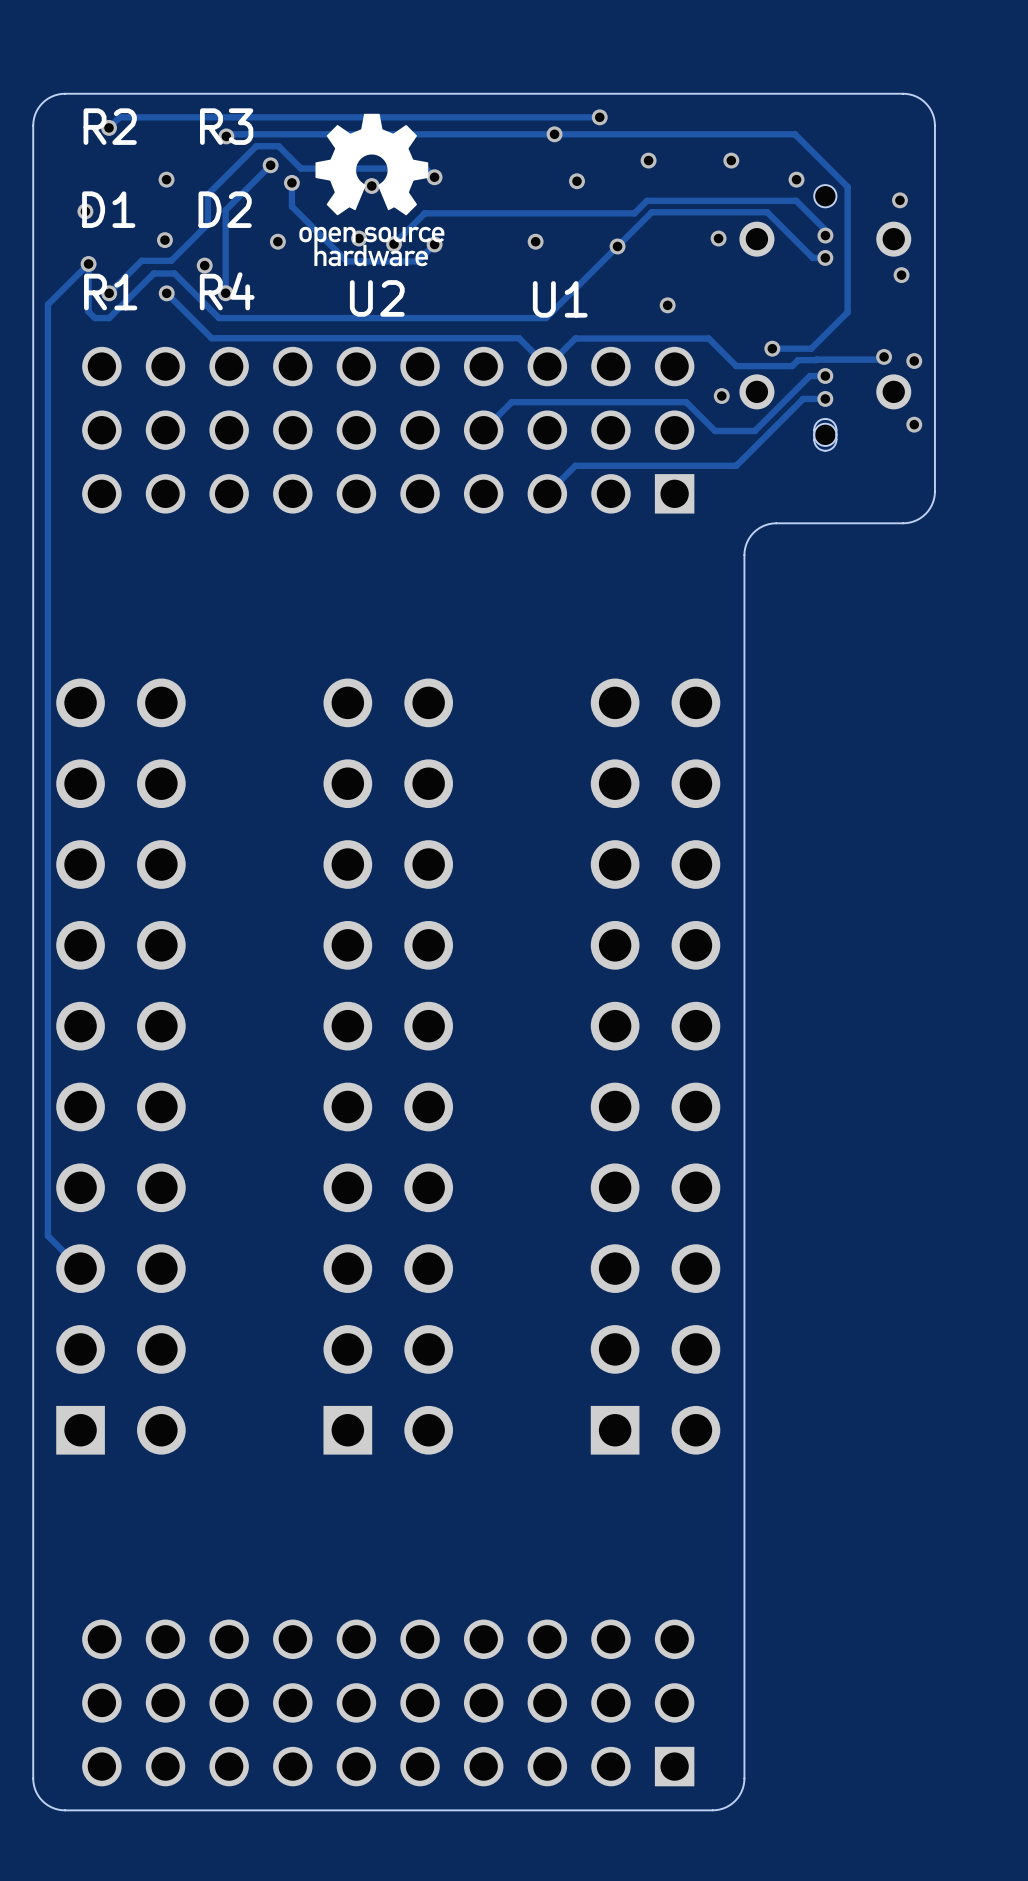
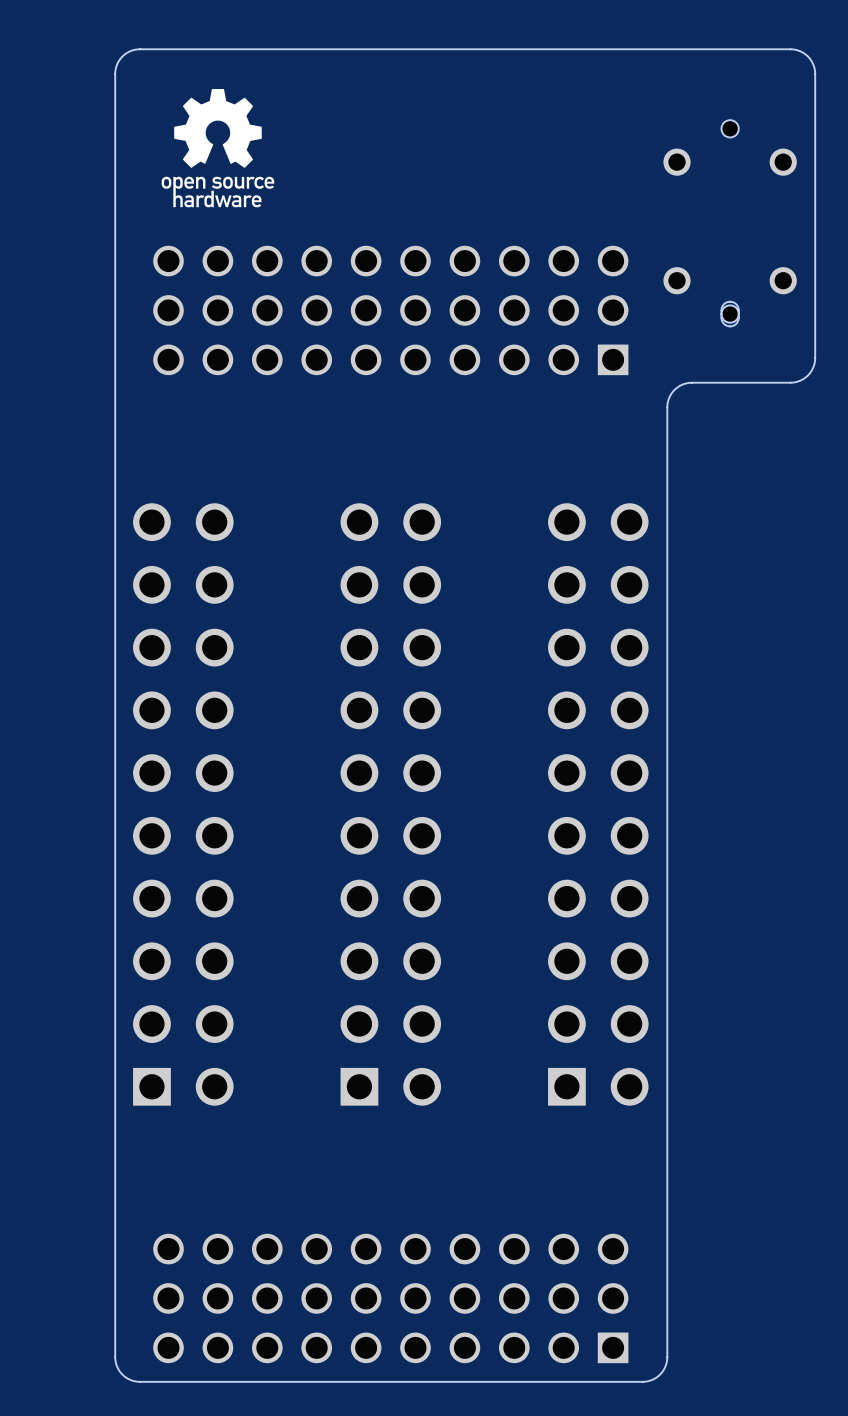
track: (599, 117) (119, 117) (109, 127) -> none
via: (599, 117) -> none
R2: (110, 126) -> none
R3: (226, 126) -> none
via: (109, 127) -> none
via: (554, 134) -> none
track: (226, 136) (228, 134) (795, 134) (847, 186) (847, 312) (811, 348) (772, 348) -> none
via: (226, 136) -> none
via: (648, 160) -> none
via: (731, 160) -> none
drawing position: (371, 164) -> (217, 128)
track: (270, 165) (225, 210) (225, 293) -> none
via: (270, 165) -> none
track: (434, 177) (425, 168) (300, 168) (278, 146) (256, 146) (207, 194) (207, 224) (171, 260) (141, 260) (109, 293) -> none
via: (434, 177) -> none
via: (166, 179) -> none
via: (796, 179) -> none
via: (577, 181) -> none
track: (291, 182) (291, 206) (346, 261) (417, 261) (434, 244) -> none
via: (291, 182) -> none
via: (371, 186) -> none
via: (899, 200) -> none
D1: (108, 209) -> none
D2: (225, 209) -> none
via: (85, 211) -> none
drawing: [299, 226, 445, 267] -> none
track: (825, 229) (796, 200) (647, 200) (634, 213) (424, 213) (394, 244) -> none
drawing position: (349, 234) -> (200, 182)
drawing position: (370, 234) -> (216, 182)
drawing position: (399, 234) -> (239, 182)
drawing position: (424, 234) -> (259, 182)
via: (825, 235) -> none
via: (359, 238) -> none
via: (718, 238) -> none
via: (164, 240) -> none
via: (277, 241) -> none
via: (535, 241) -> none
via: (394, 244) -> none
via: (434, 244) -> none
drawing position: (320, 246) -> (178, 191)
via: (617, 246) -> none
drawing position: (360, 255) -> (209, 199)
drawing: none -> [161, 176, 275, 208]
track: (825, 257) (812, 257) (767, 212) (651, 212) (545, 318) (219, 318) (174, 273) (153, 273) (109, 318) (94, 318) (88, 311) (88, 263) (47, 304) (47, 1235) (80, 1268) -> none
via: (825, 257) -> none
drawing position: (334, 258) -> (189, 201)
drawing position: (378, 258) -> (223, 201)
drawing position: (395, 258) -> (236, 201)
via: (88, 263) -> none
via: (204, 265) -> none
via: (901, 275) -> none
R4: (227, 291) -> none
R1: (110, 292) -> none
via: (109, 293) -> none
track: (166, 293) (211, 338) (519, 338) (547, 366) (575, 338) (708, 338) (736, 366) (792, 366) (798, 360) (881, 359) (884, 356) -> none
via: (166, 293) -> none
via: (225, 293) -> none
U2: (377, 298) -> none
U1: (560, 299) -> none
via: (667, 305) -> none
via: (772, 348) -> none
via: (884, 356) -> none
via: (914, 361) -> none
track: (825, 376) (809, 376) (754, 431) (715, 431) (686, 402) (511, 402) (483, 430) -> none
via: (825, 376) -> none
via: (721, 396) -> none
track: (825, 398) (803, 398) (736, 465) (575, 465) (547, 493) -> none
via: (825, 398) -> none
via: (914, 424) -> none

